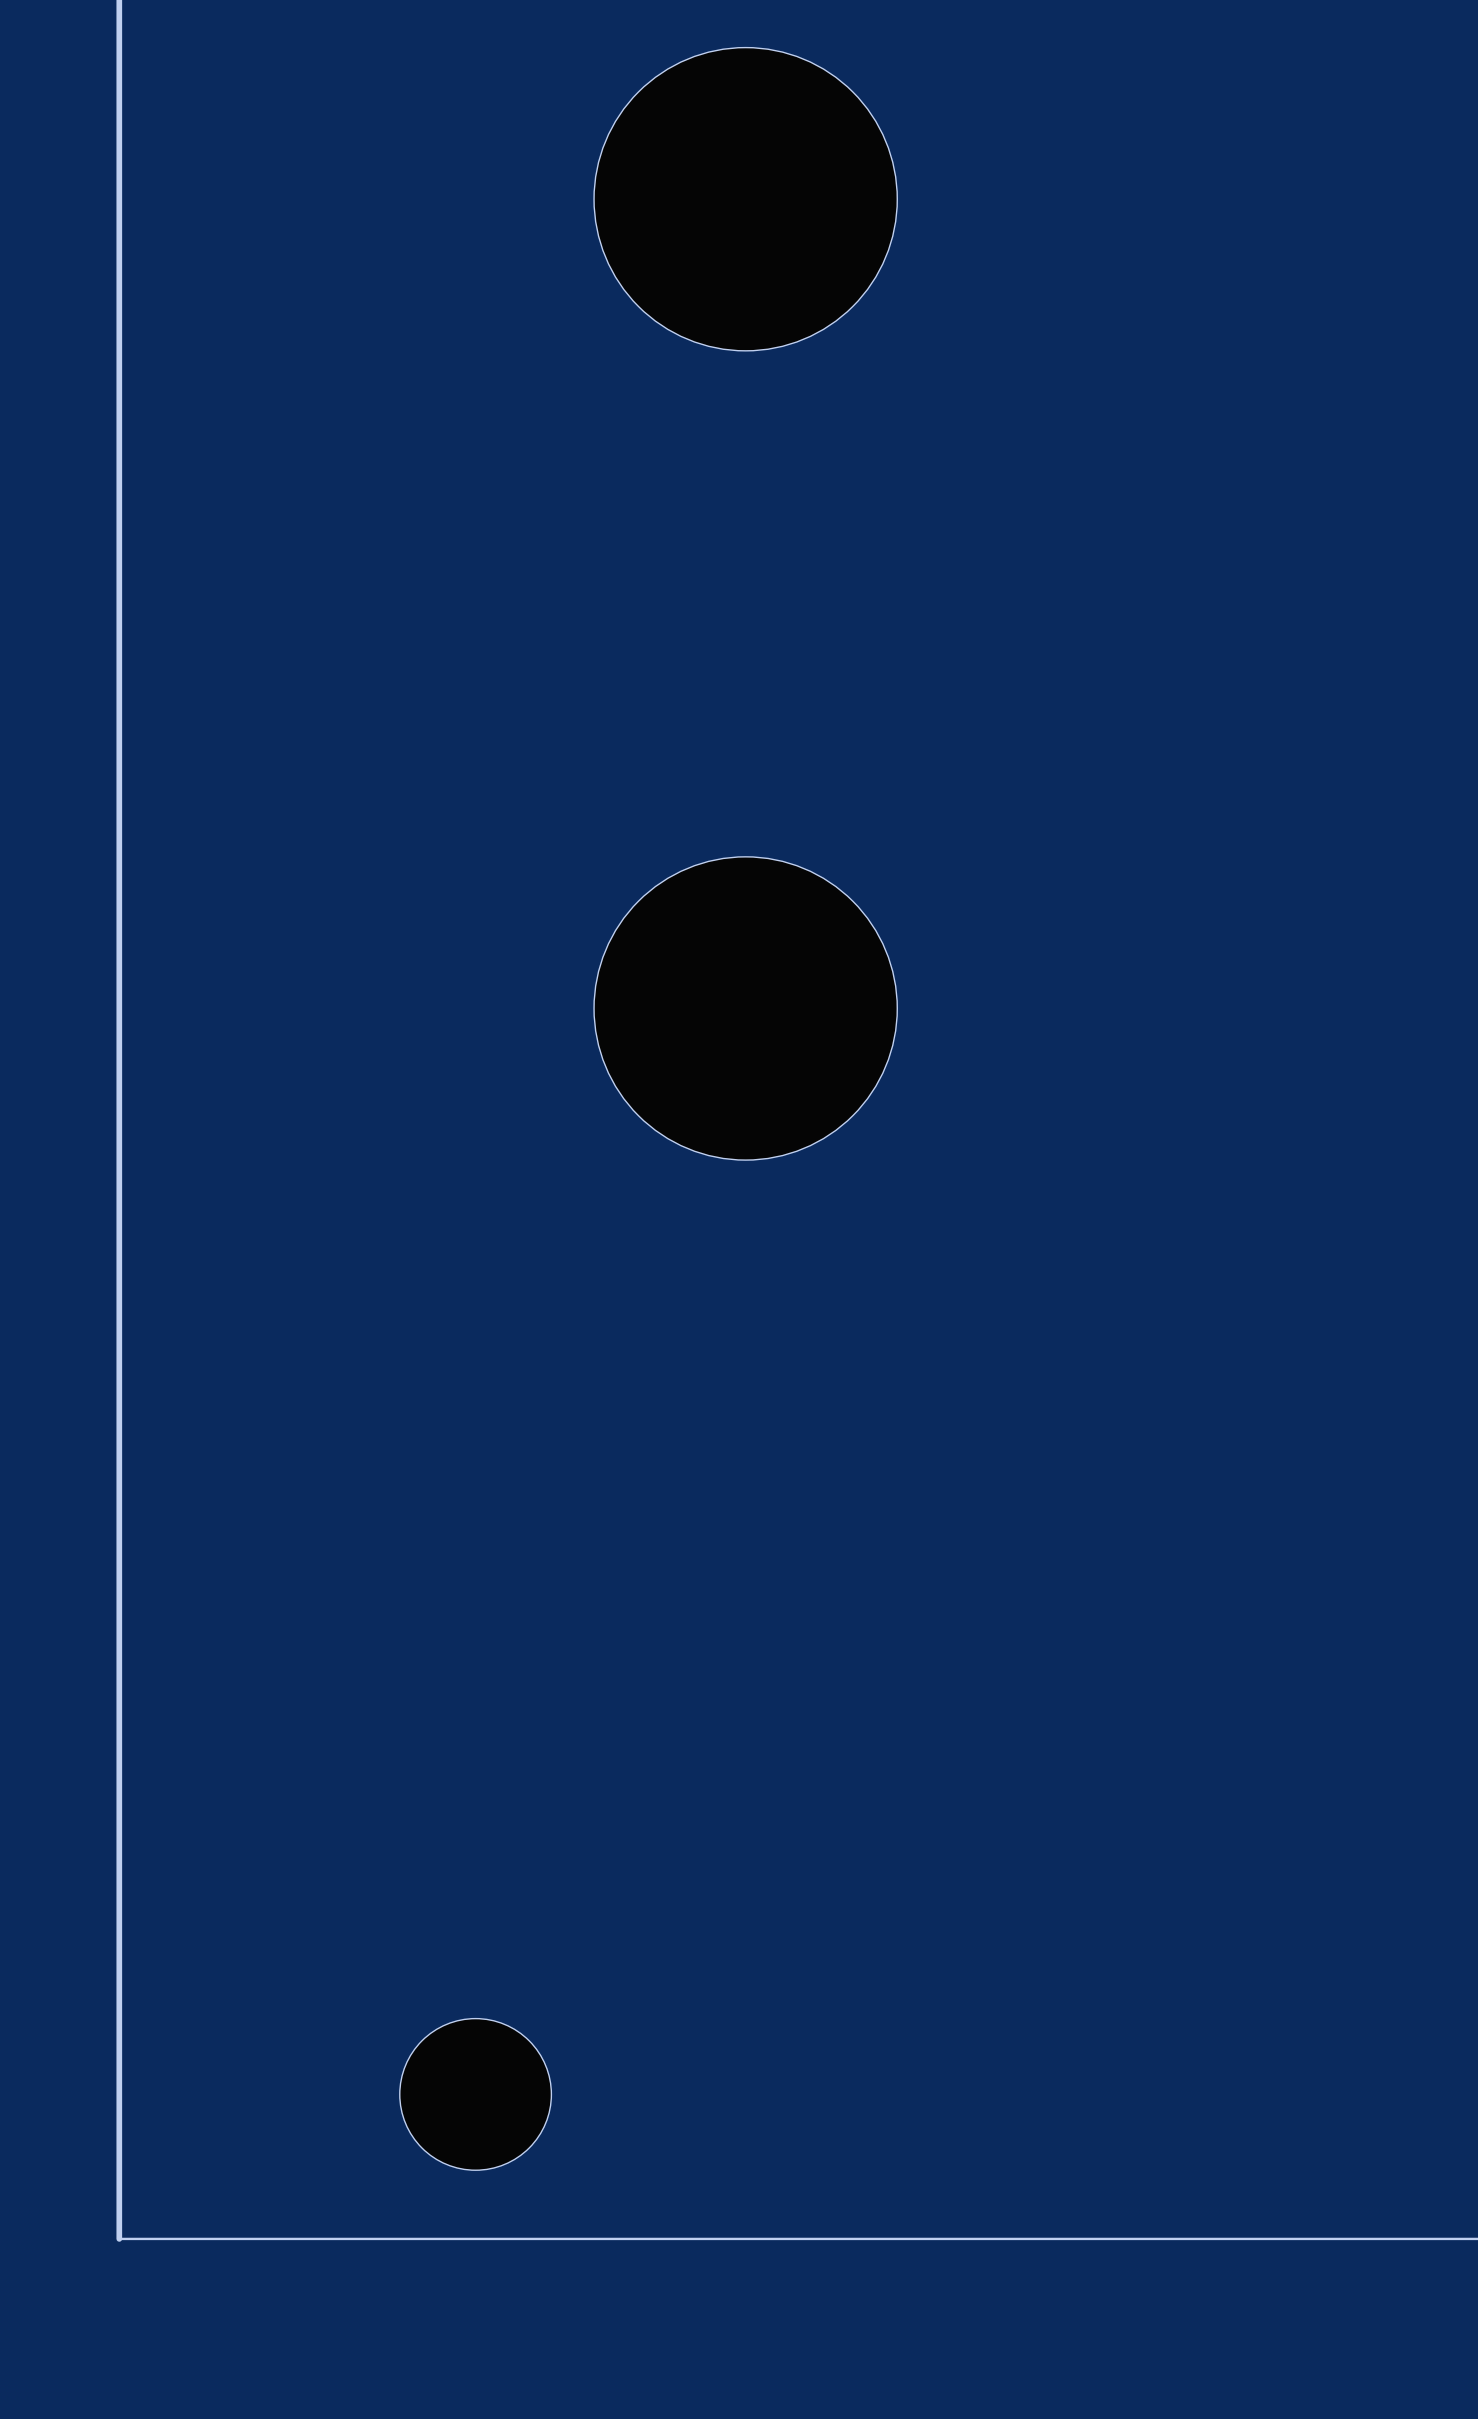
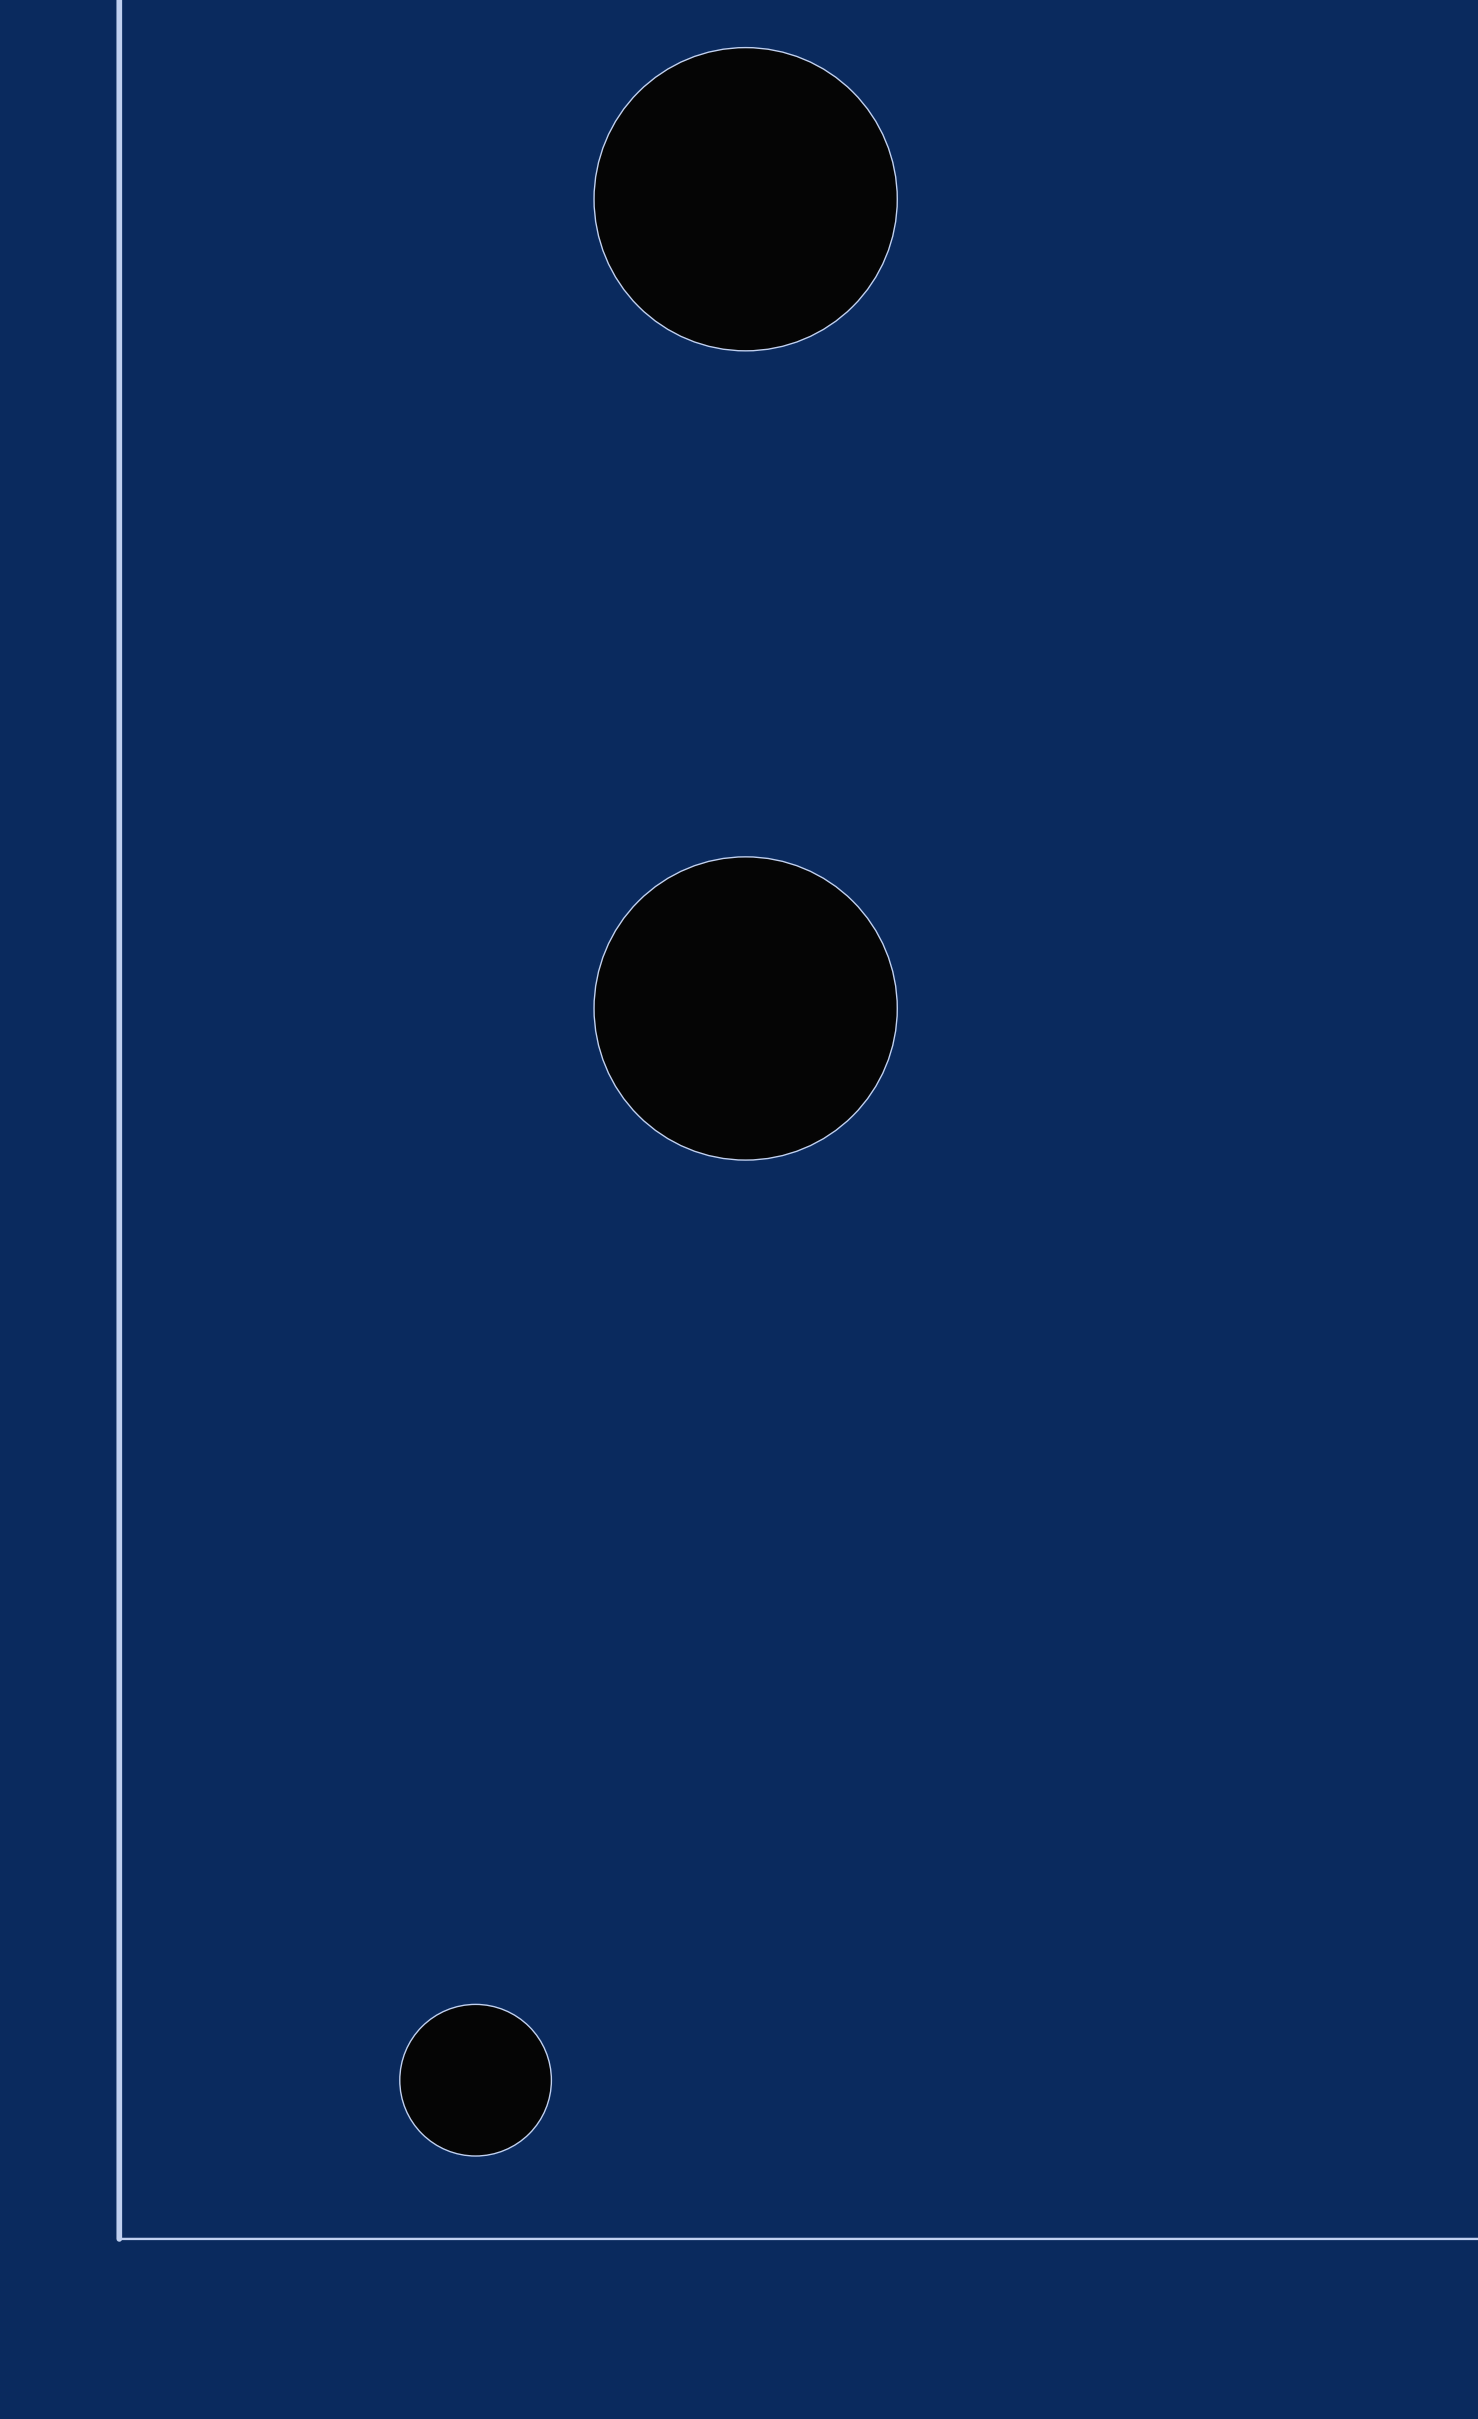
part position: (475, 2094) -> (475, 2080)

